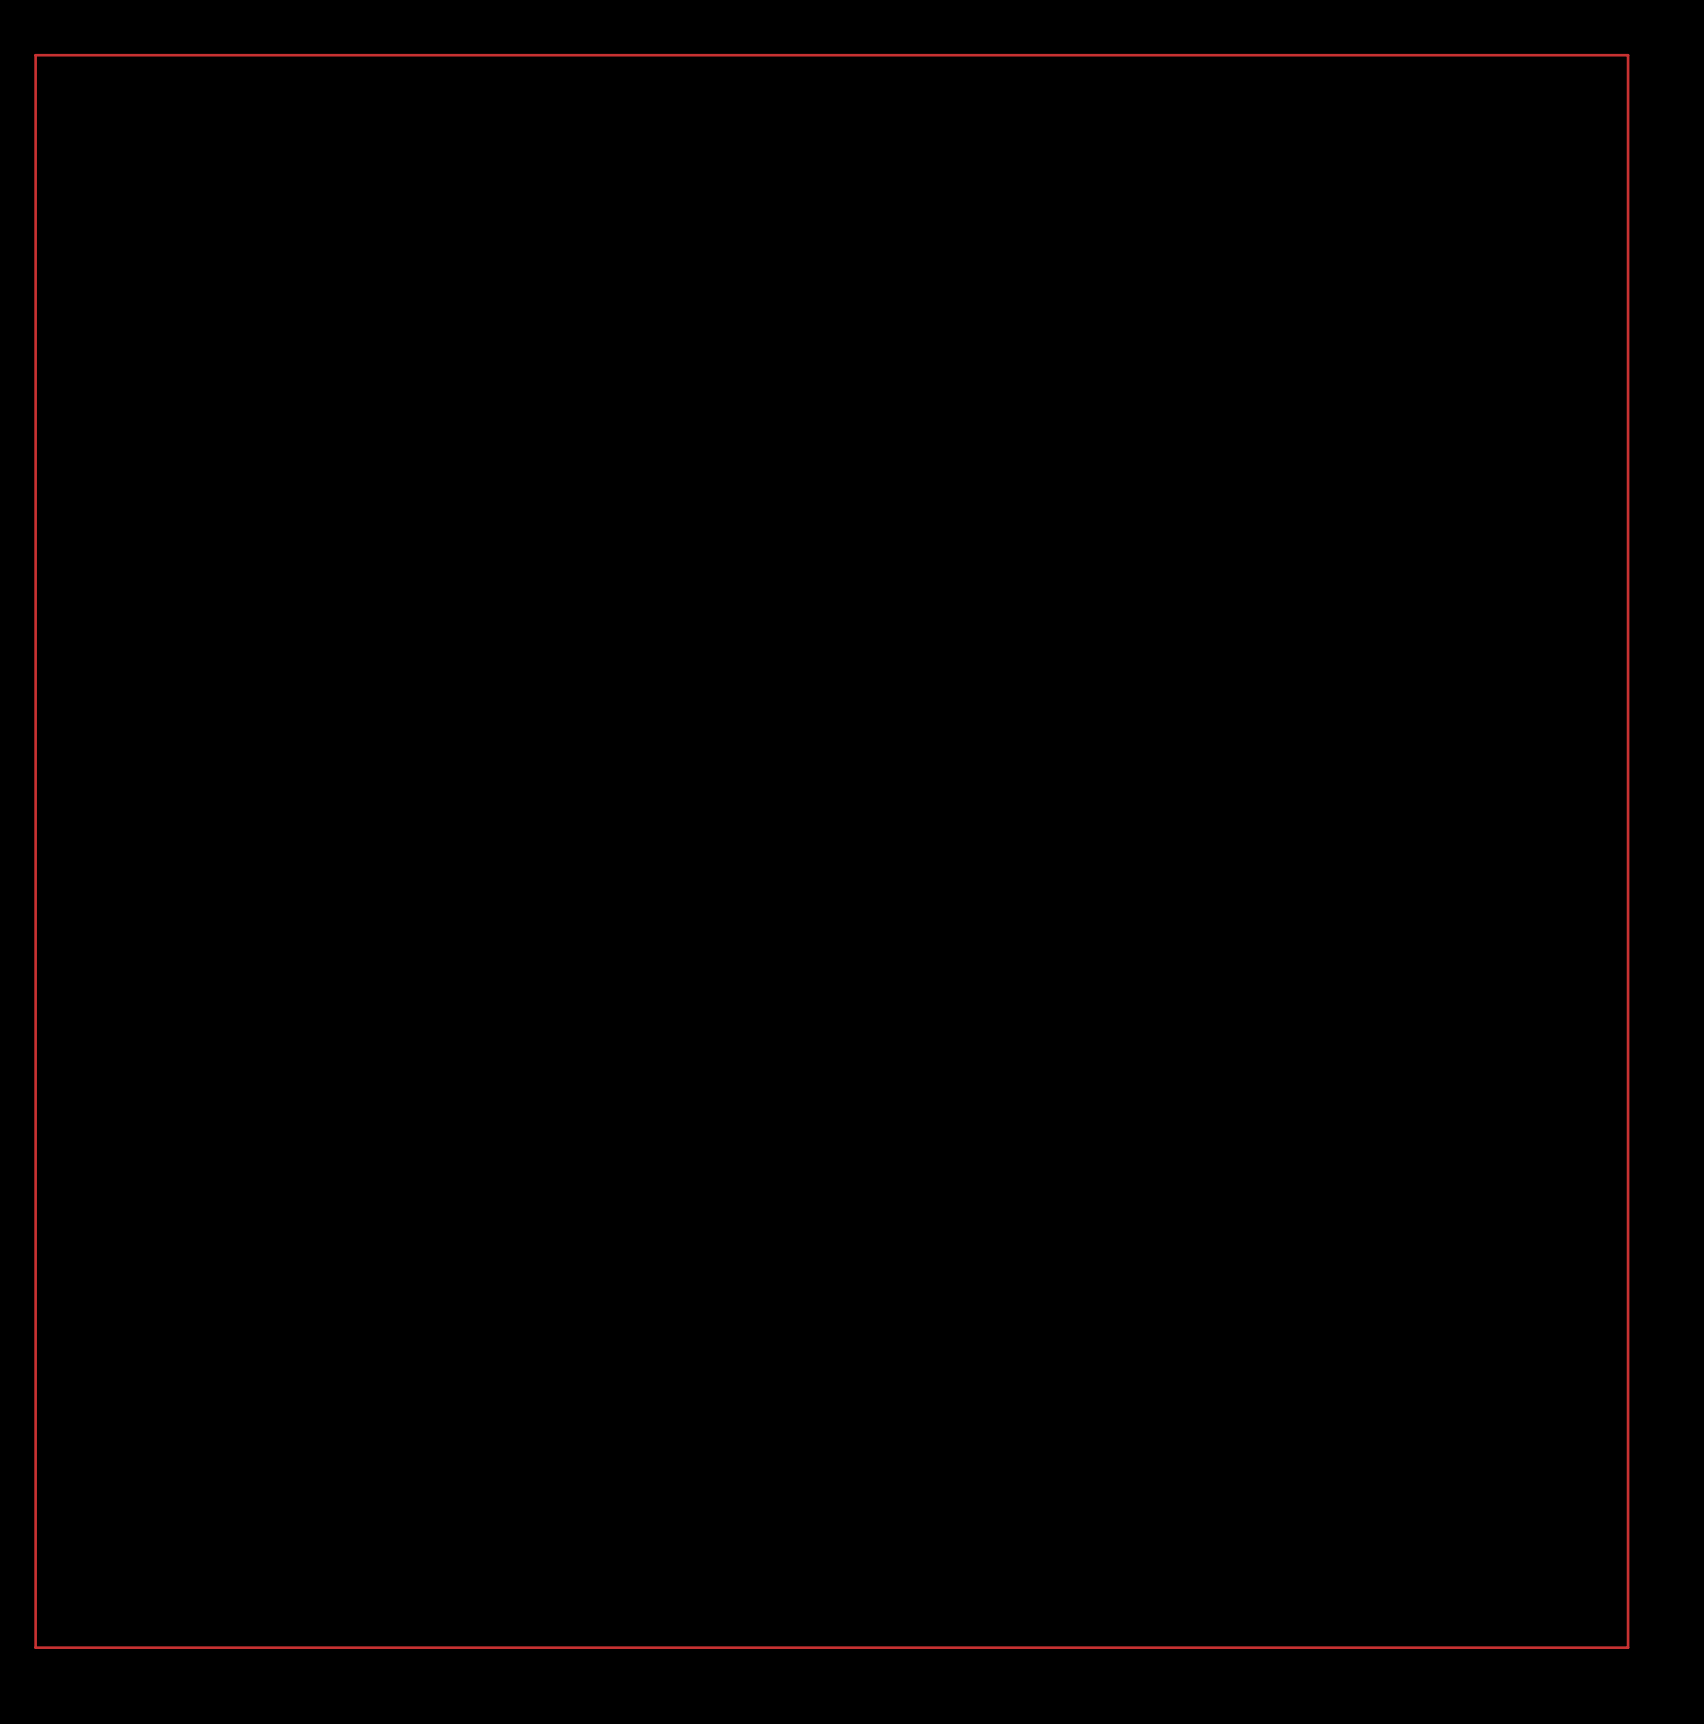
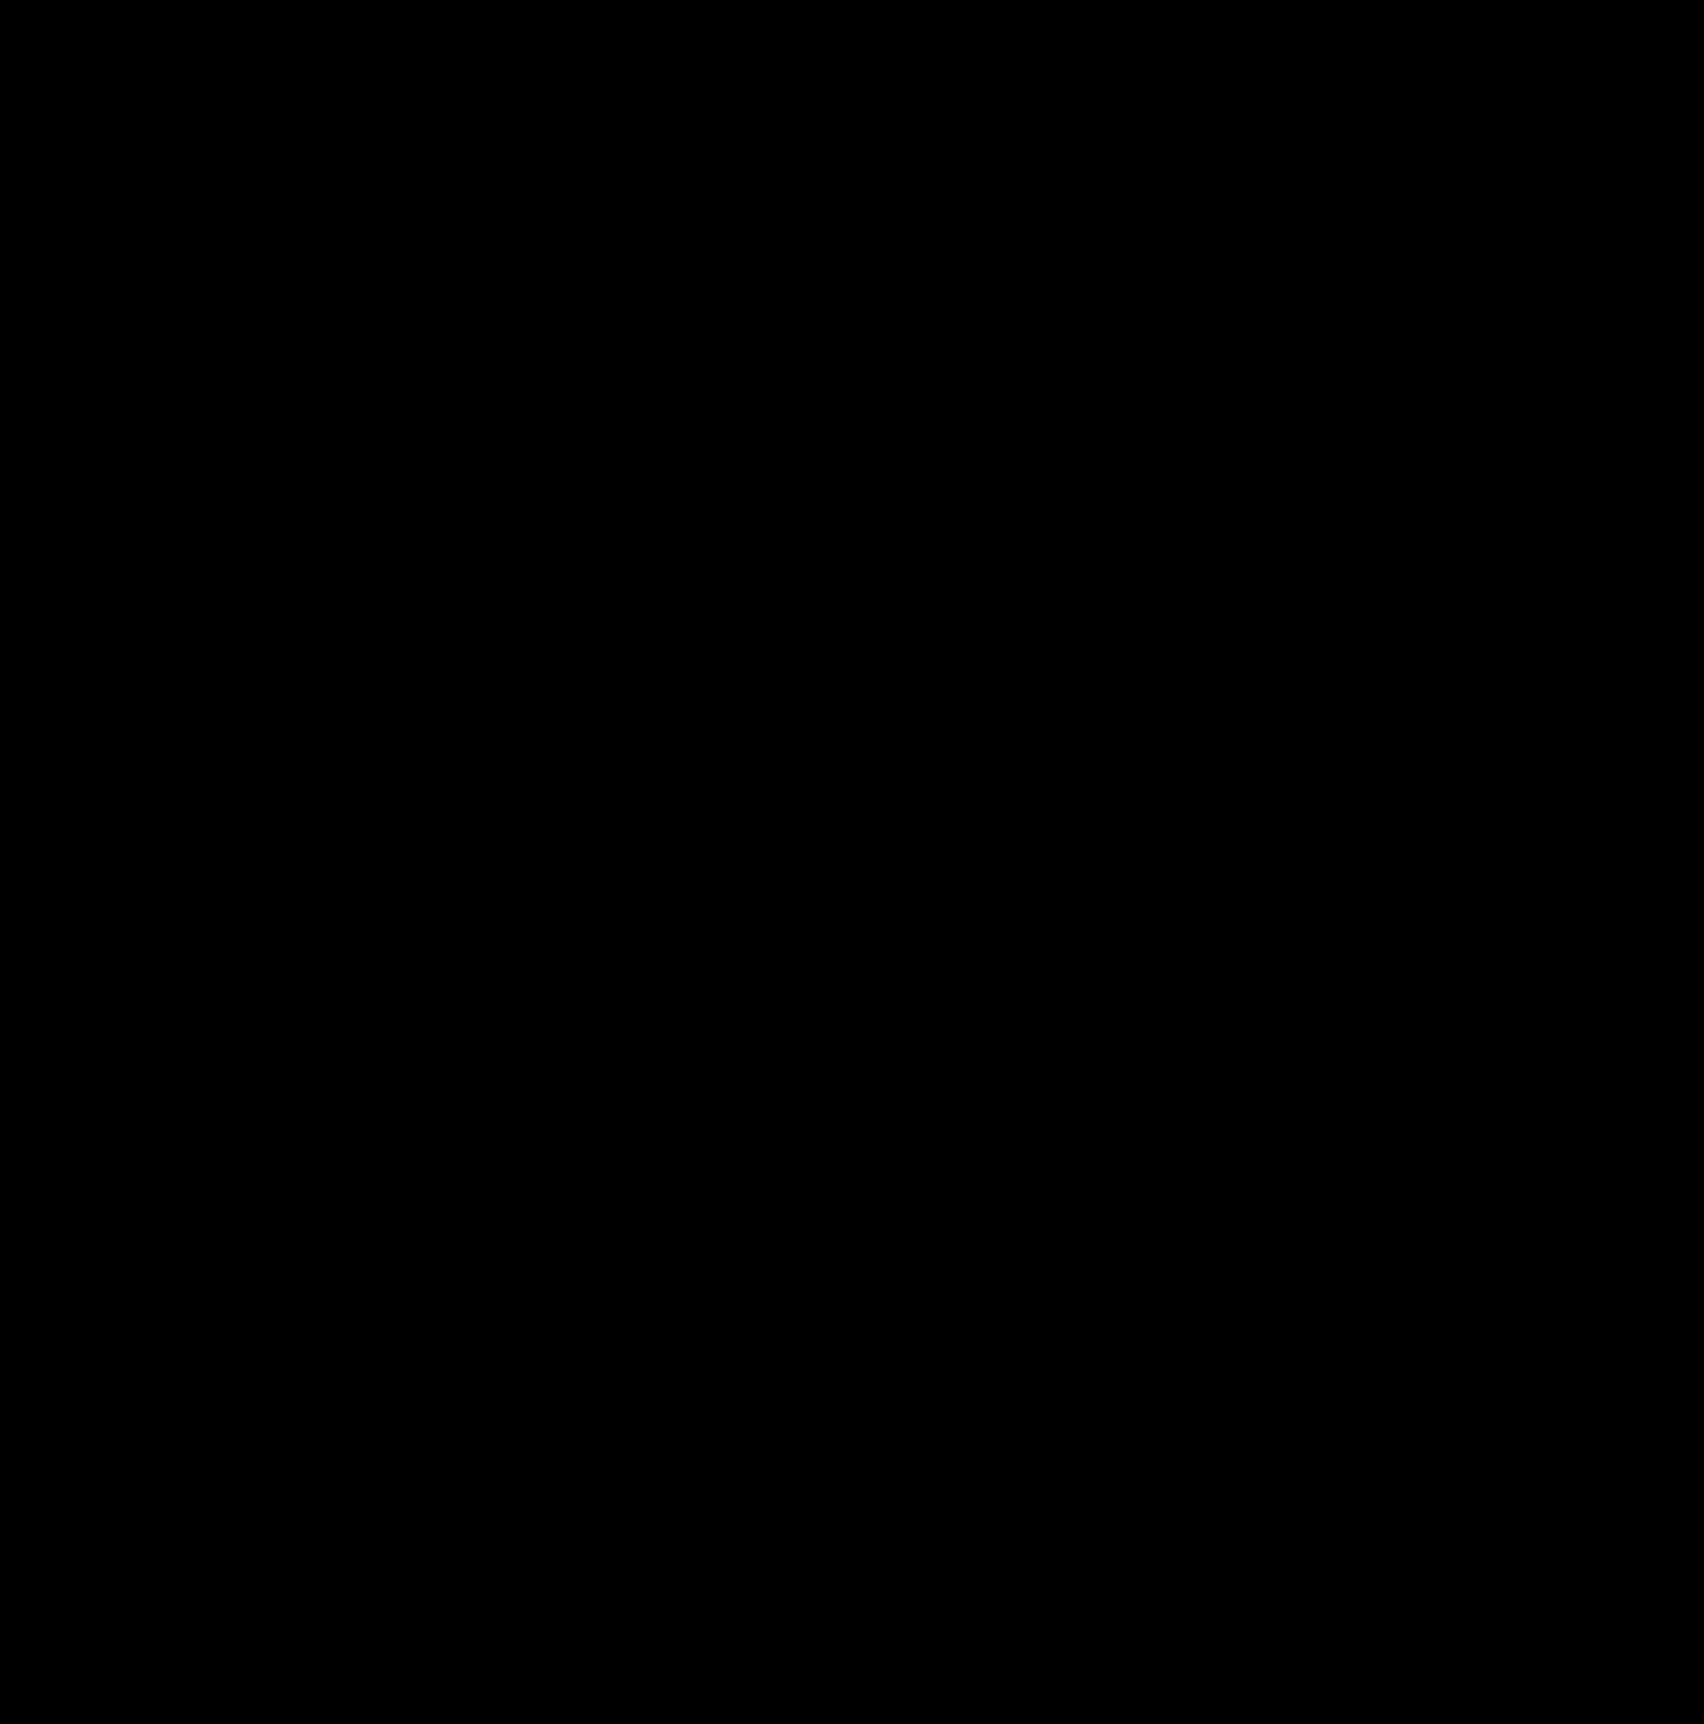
top track: (35, 55) (1628, 55) (1628, 1647) (35, 1647) (35, 55) -> none

